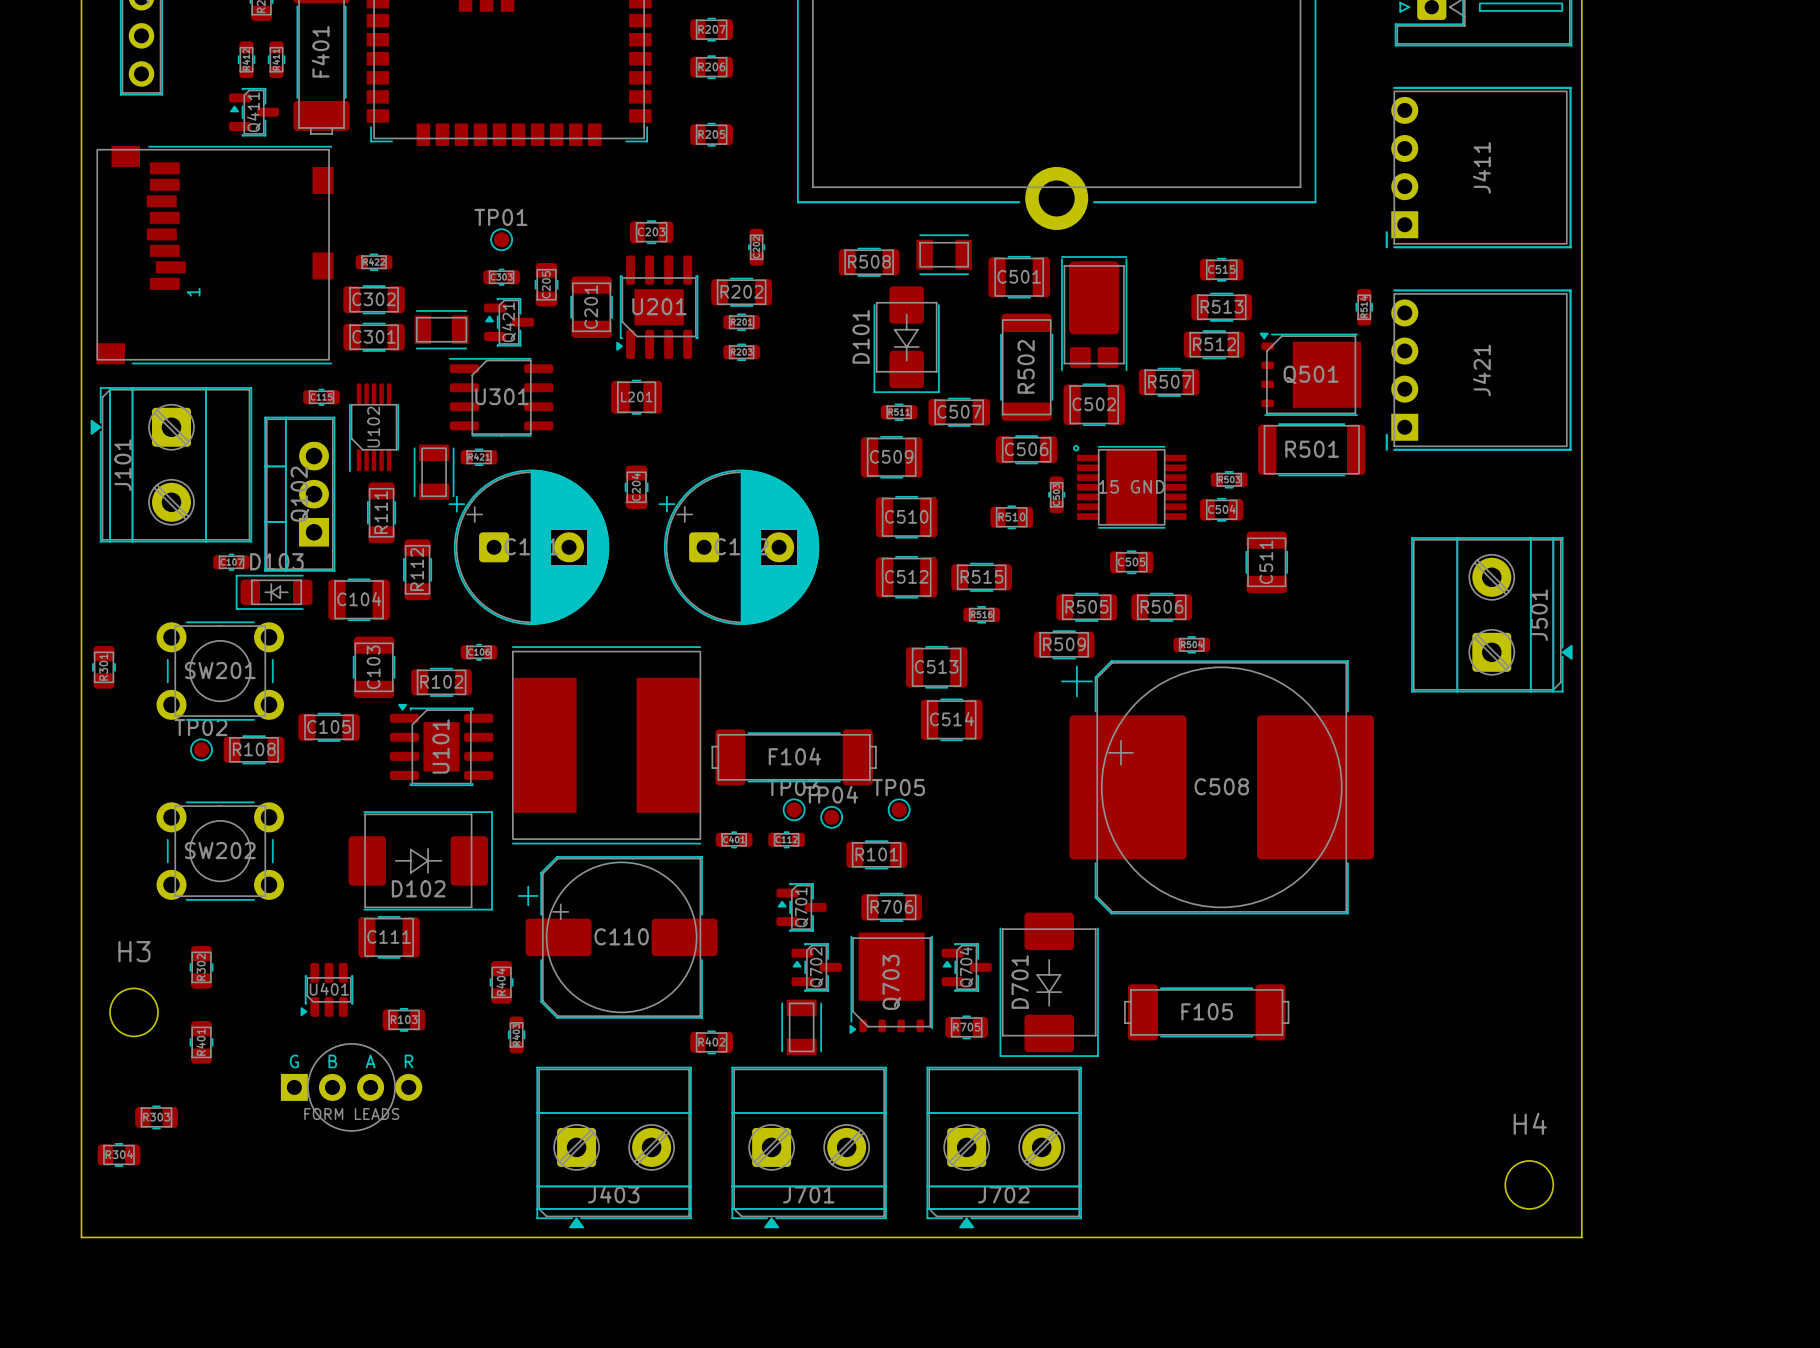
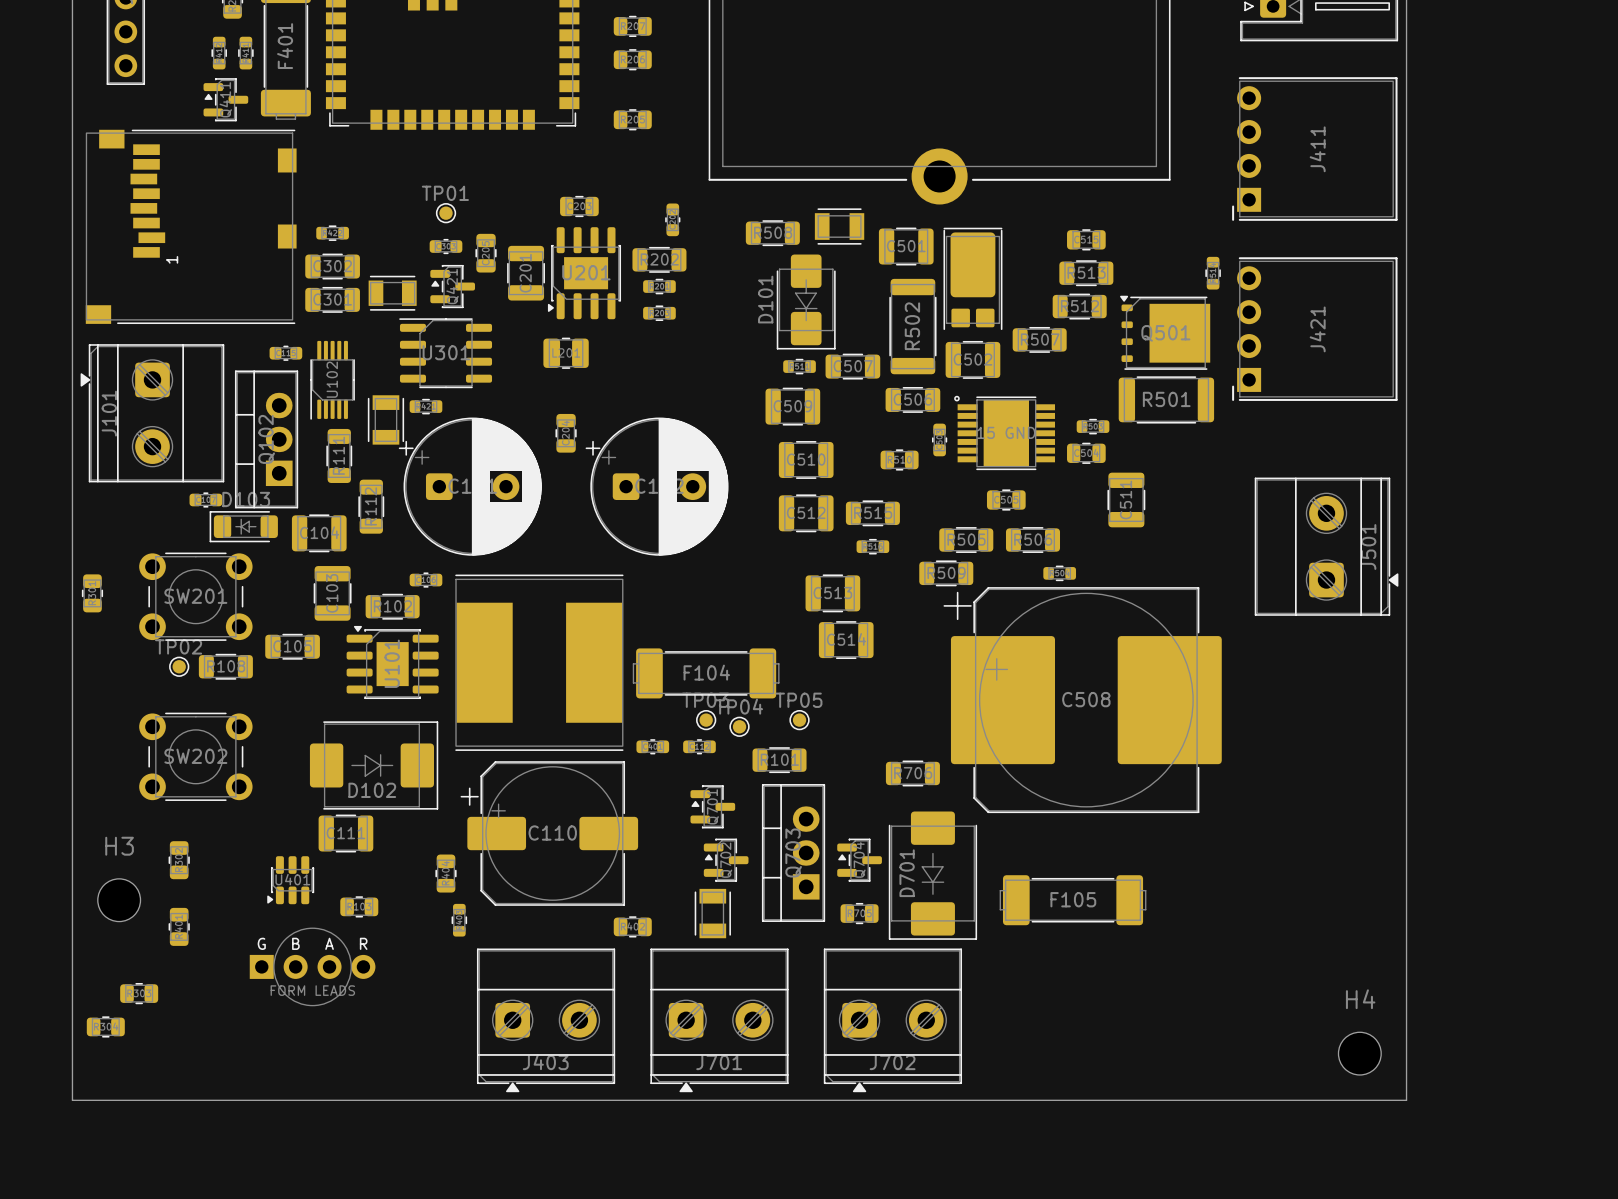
R706 position: (891, 907) -> (912, 773)
Q703 footprint: [849, 932, 933, 1034] -> [761, 784, 826, 922]

